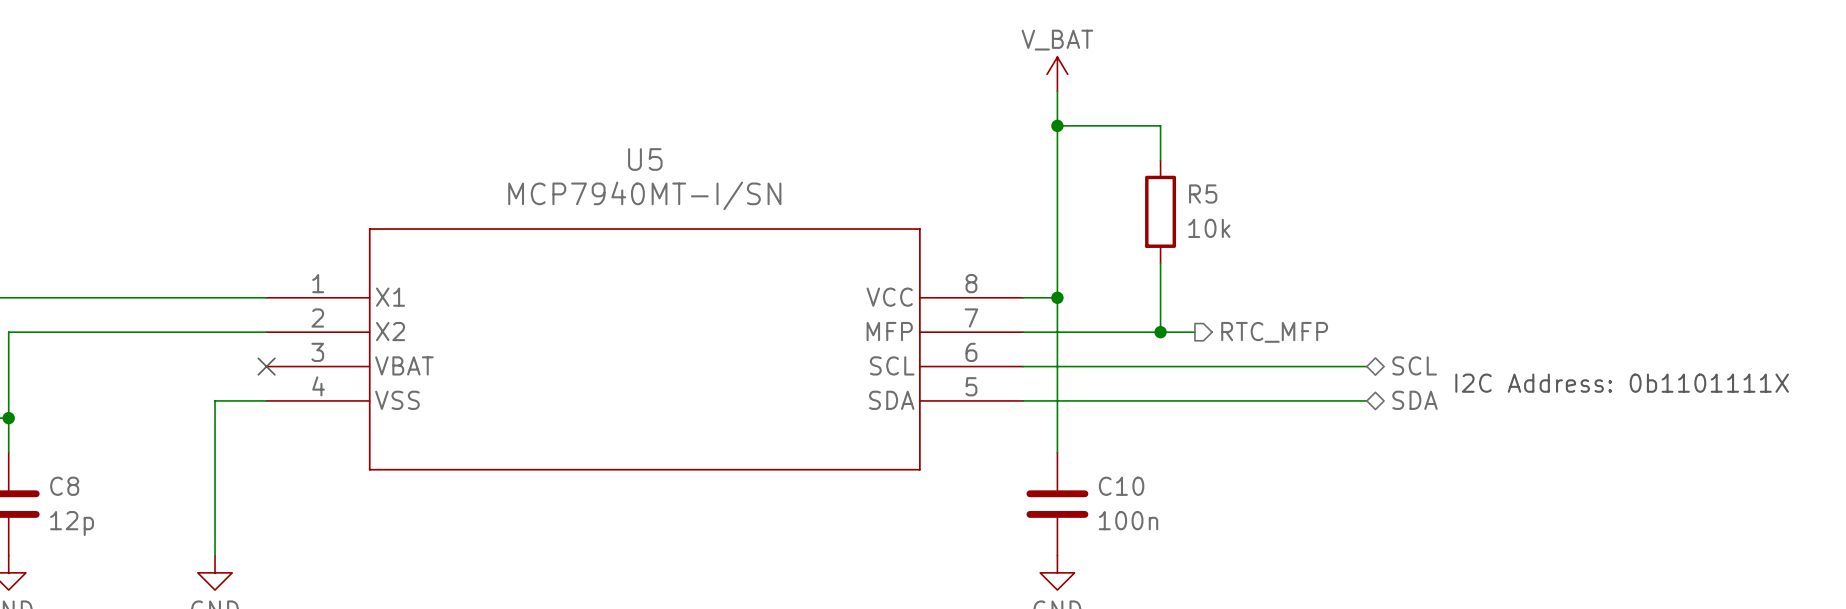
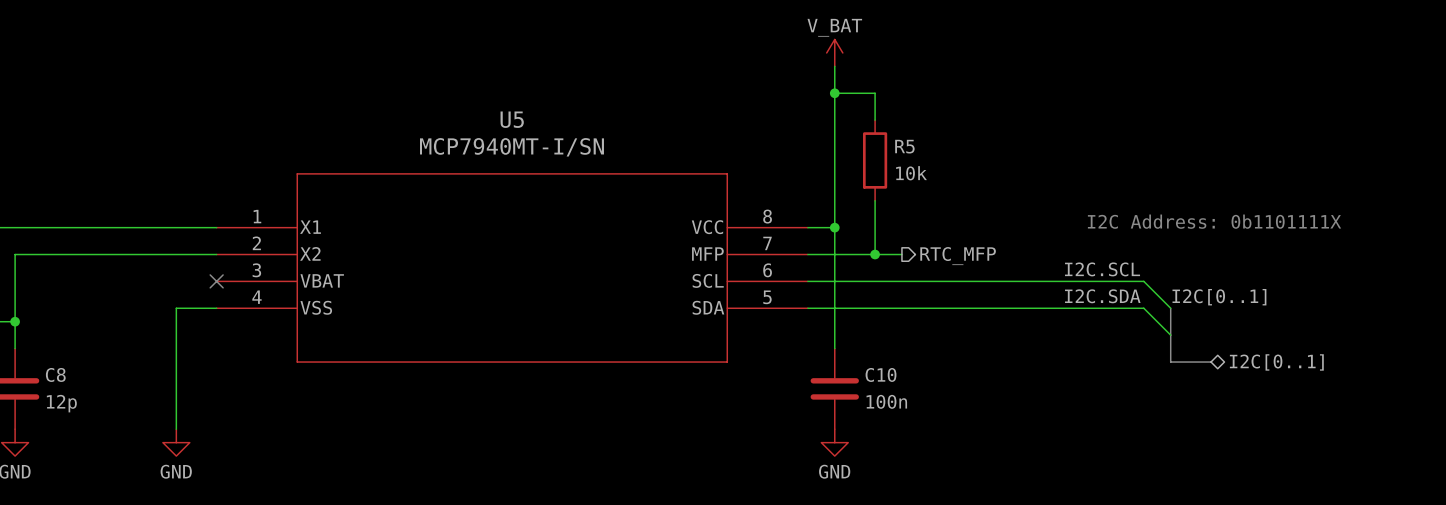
wire: (1108, 125) (1160, 125) (1160, 160) -> (875, 93) (875, 120)
R5 position: (1160, 211) -> (875, 160)
wire: (1160, 263) (1160, 332) -> (875, 200) (875, 254)
wire: (1143, 332) (1194, 332) -> none
junction position: (1160, 332) -> (875, 254)
hierarchical label position: RTC_MFP (1274, 332) -> RTC_MFP (958, 256)
label: none -> I2C.SCL (1102, 269)
hierarchical label: SCL (1414, 365) -> none
wire: none -> (1076, 281) (1143, 281) (1170, 308)
text position: I2C Address: 0b1101111X (1622, 383) -> I2C Address: 0b1101111X (1214, 221)
label: none -> I2C.SDA (1102, 296)
label: none -> I2C[0..1] (1219, 297)
wire: none -> (1076, 308) (1143, 308) (1170, 335)
hierarchical label: SDA (1415, 400) -> none
bus: none -> (1170, 308) (1170, 362) (1211, 362)
hierarchical label: none -> I2C[0..1] (1276, 362)

